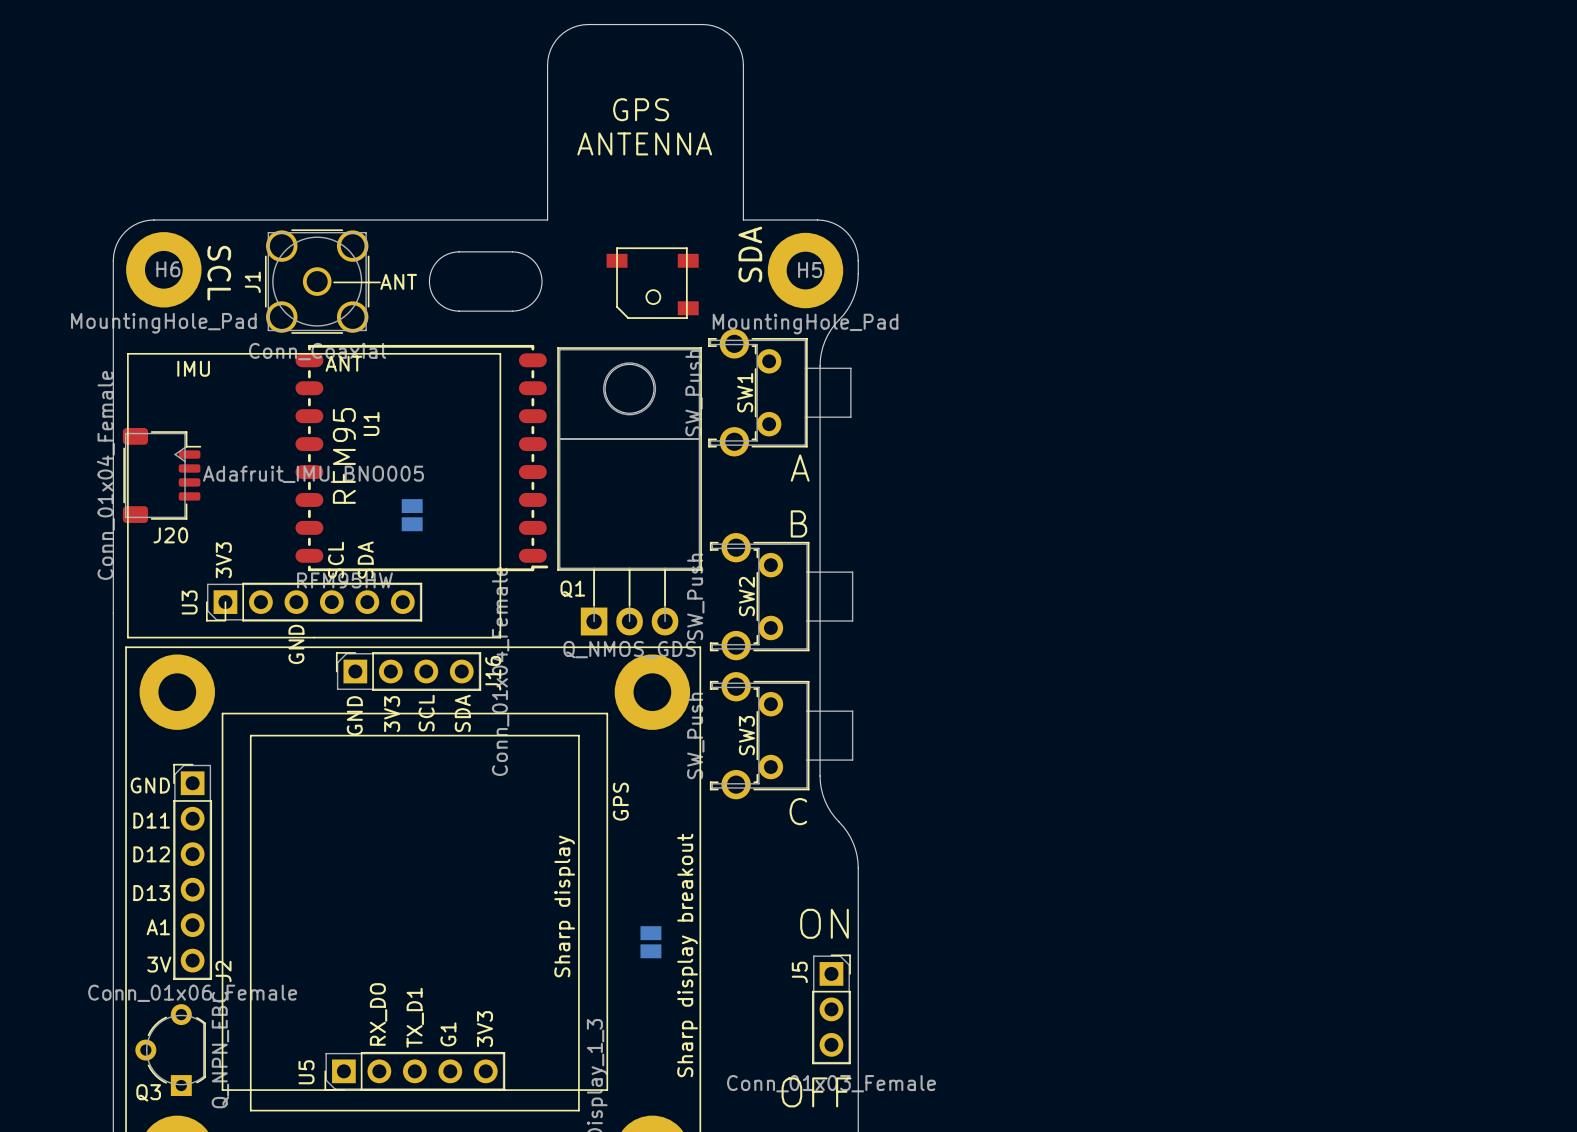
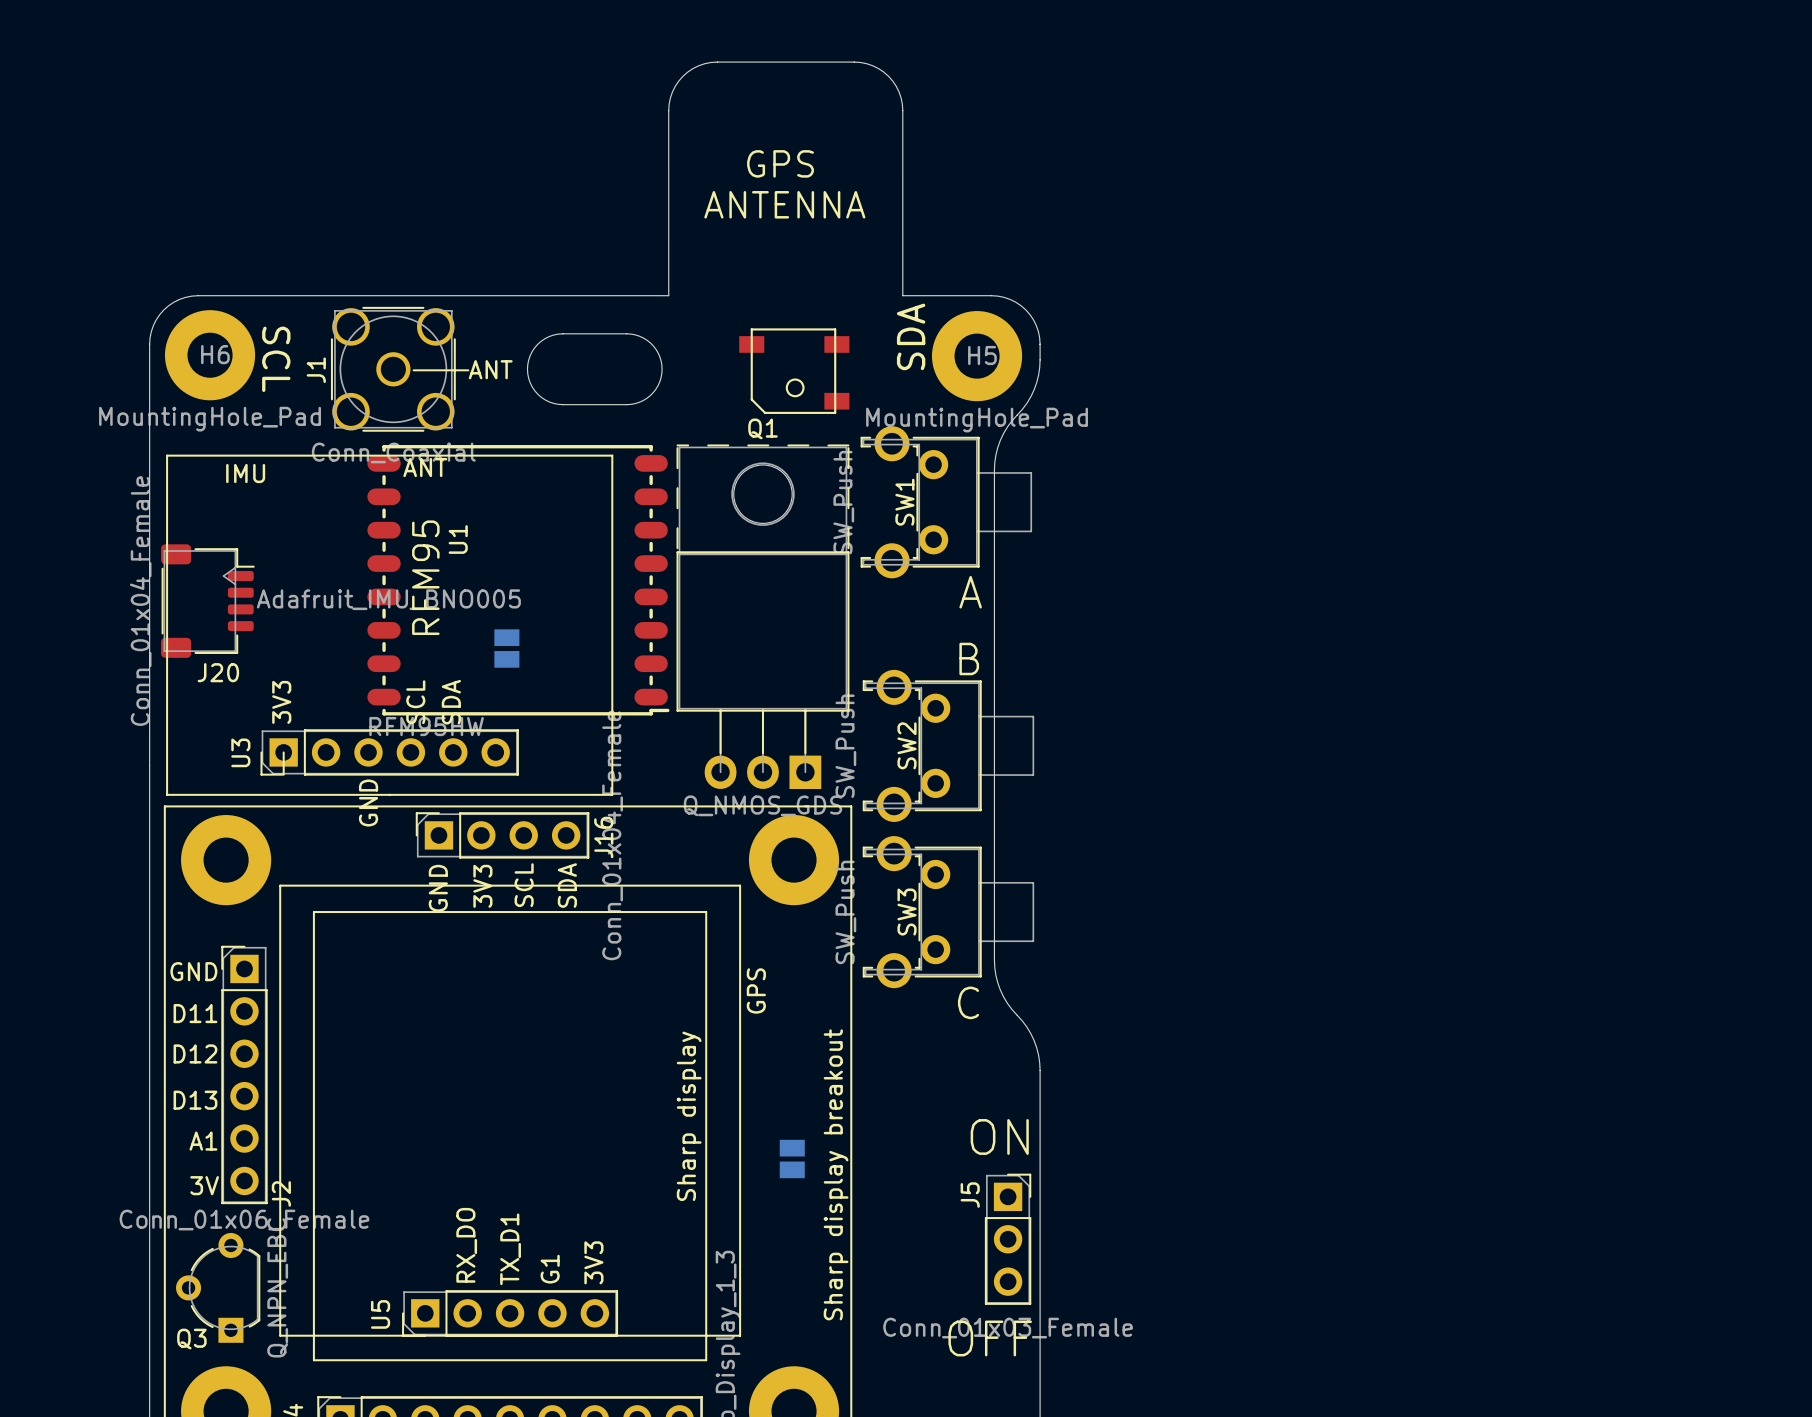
Q1 footprint: [557, 347, 702, 636] -> [676, 444, 850, 789]
Q1 name position: Q1 (572, 589) -> Q1 (762, 428)

